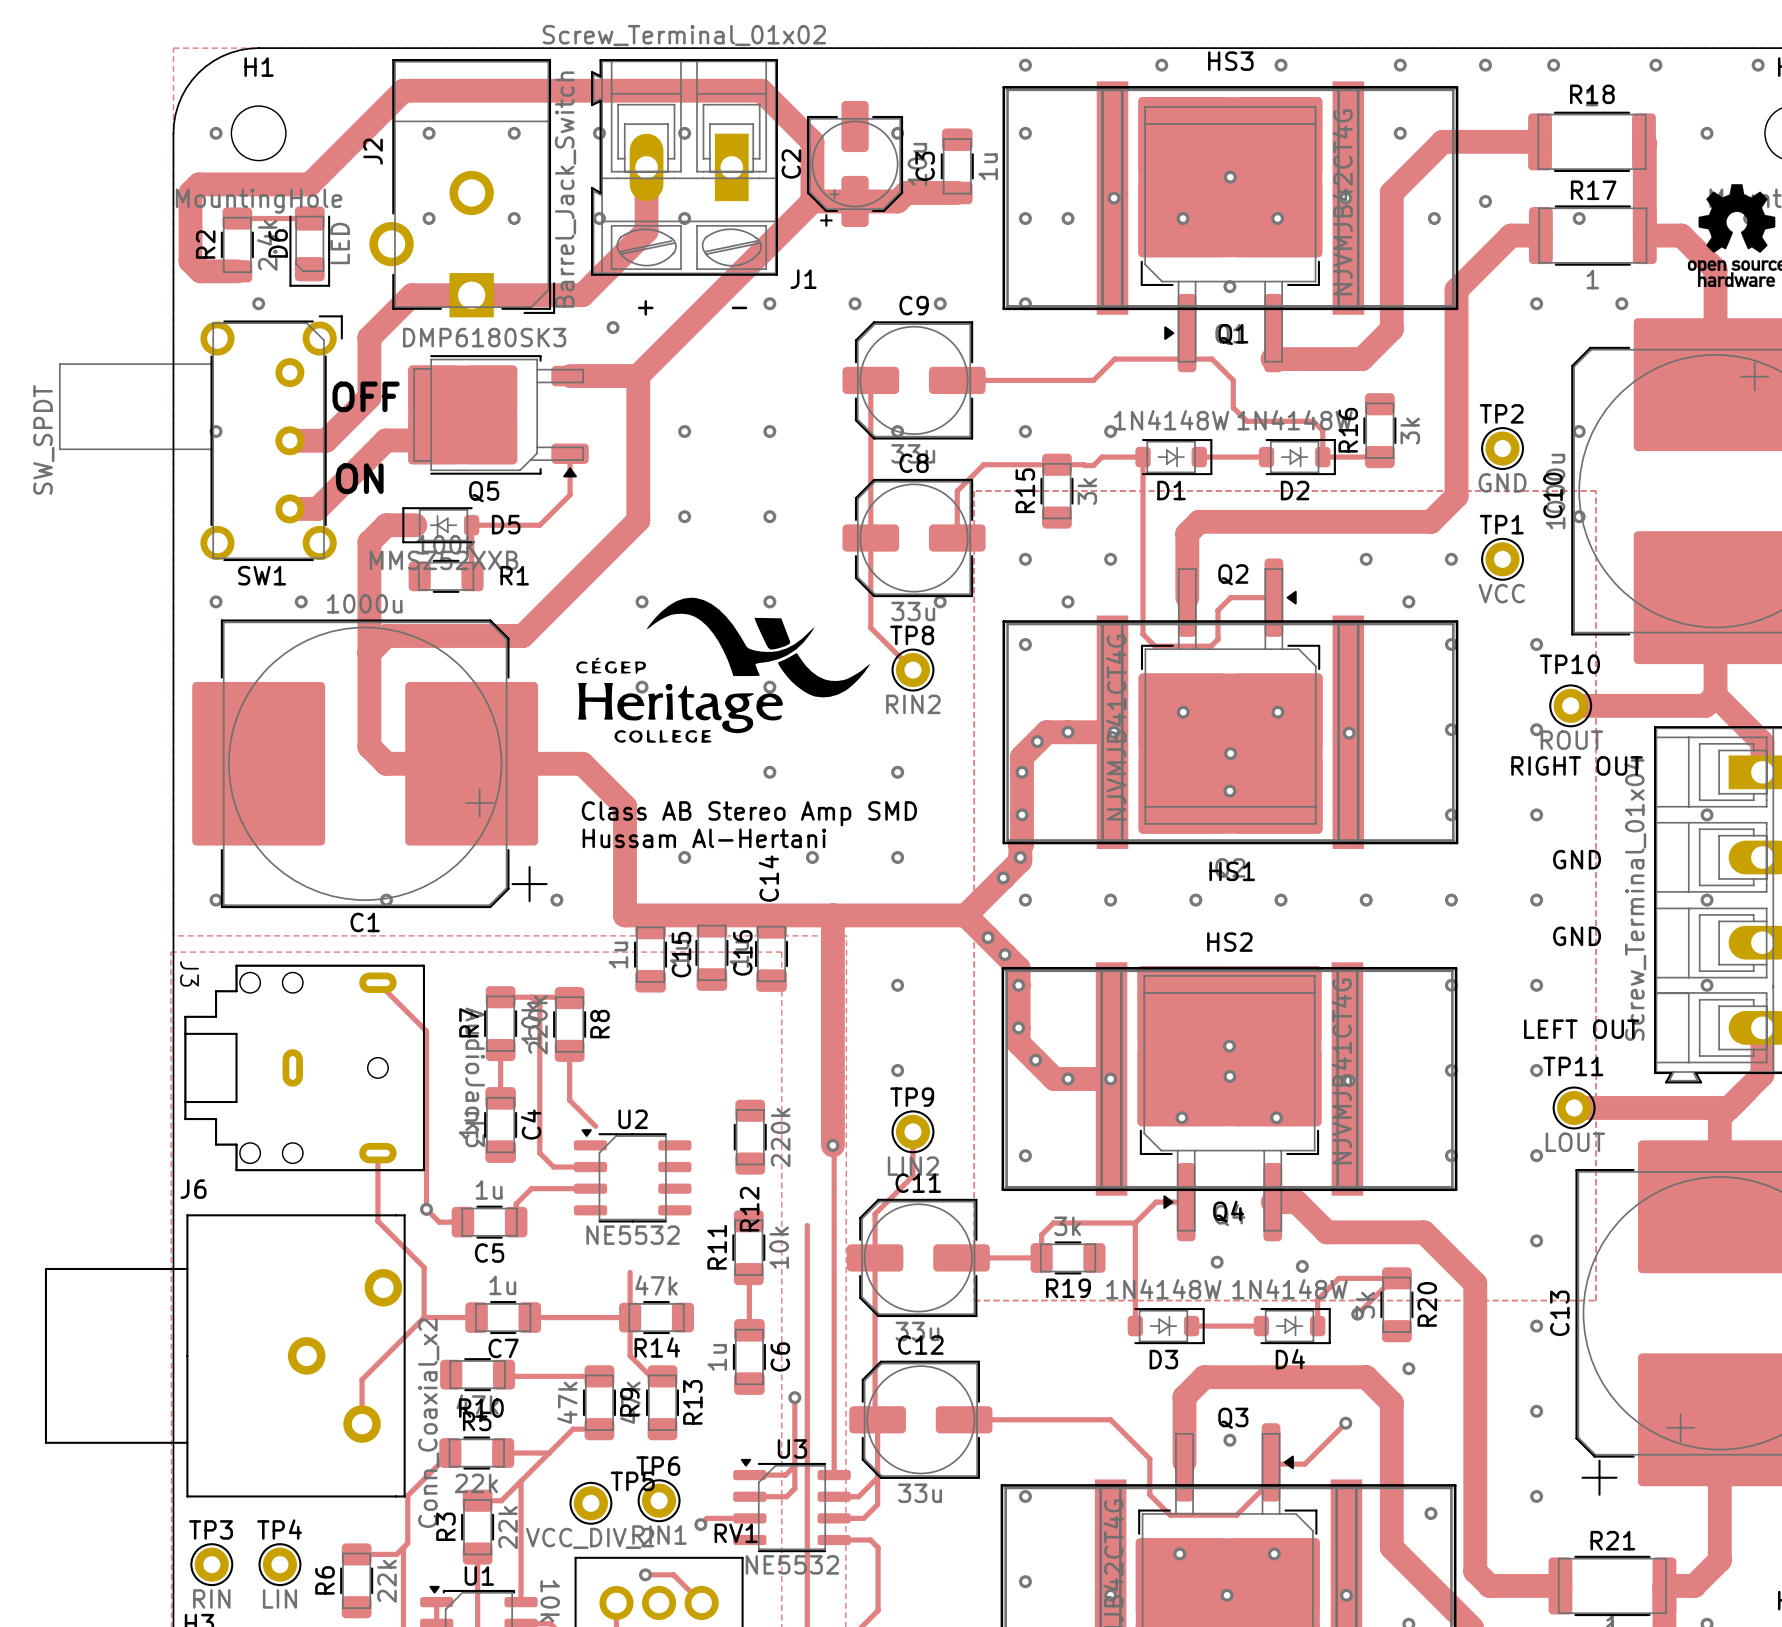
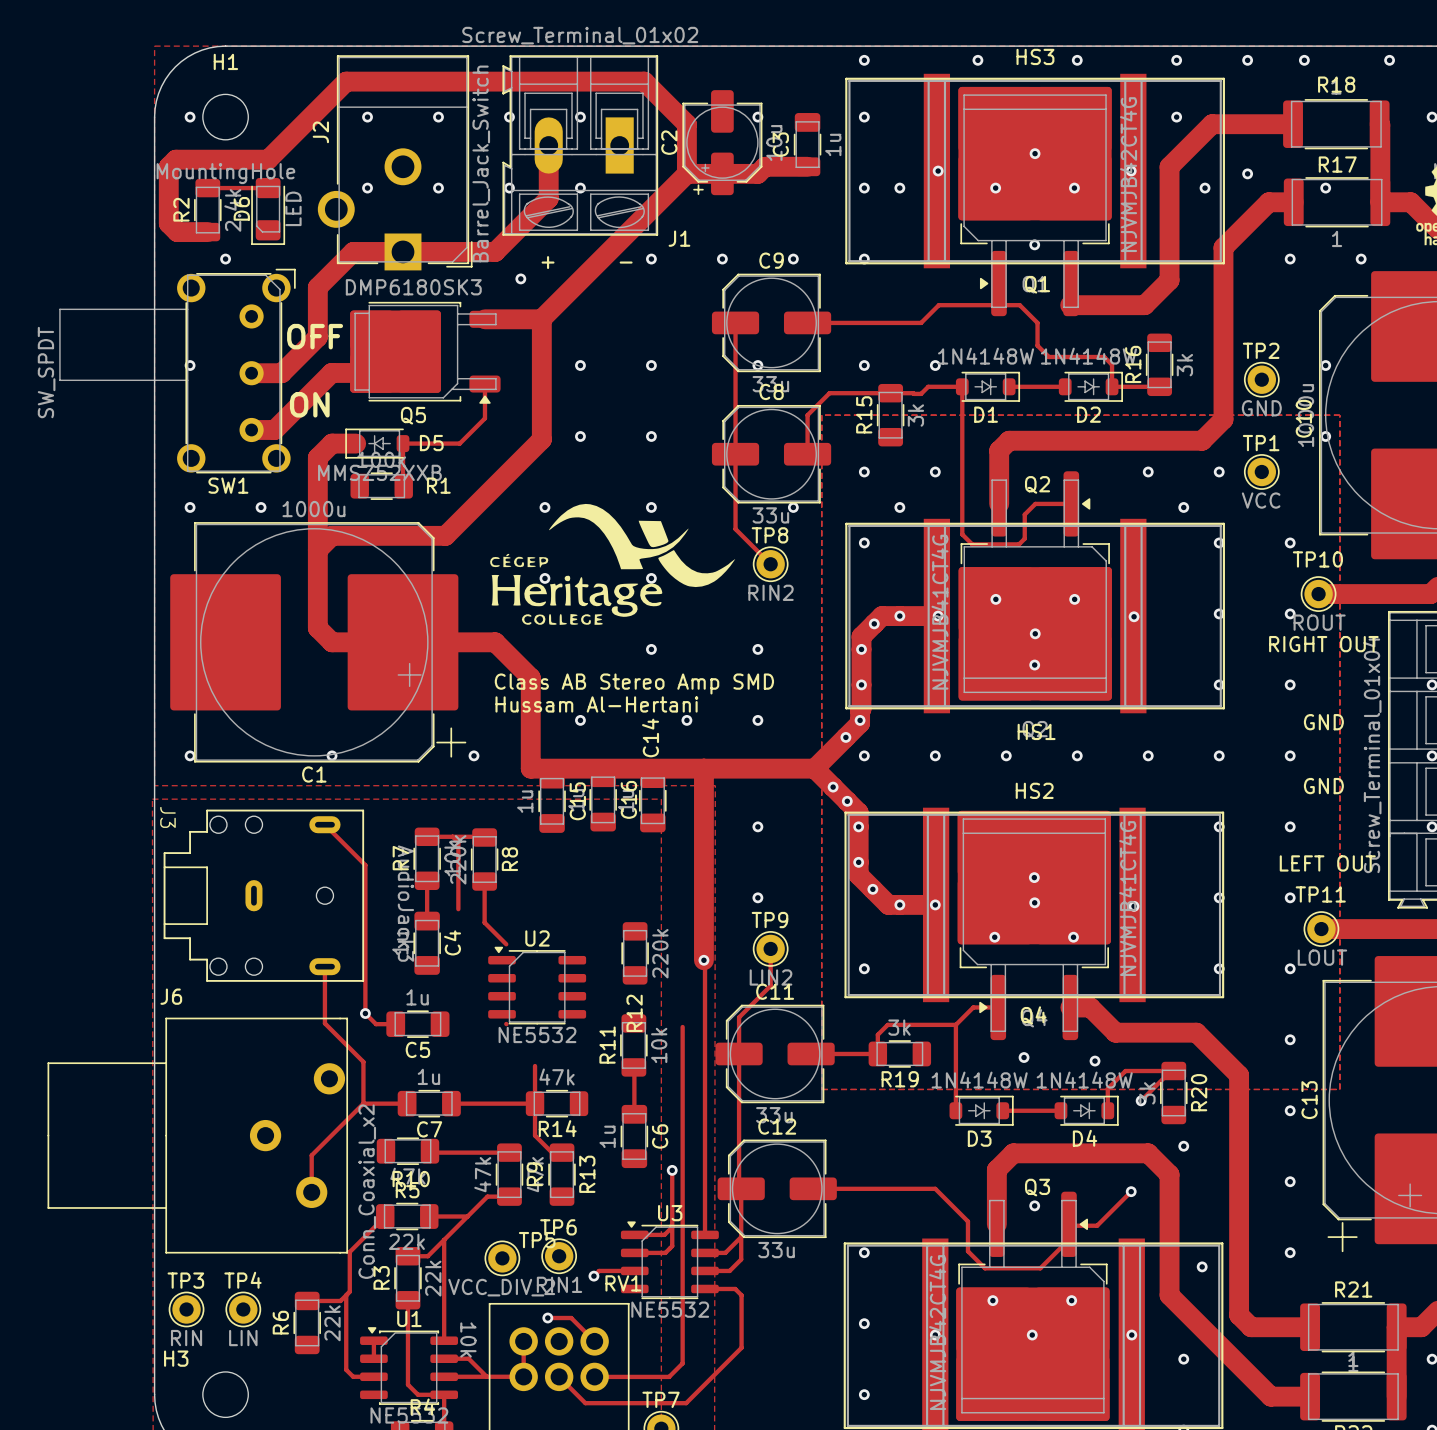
track: (538, 1004) (539, 1005) (539, 1153) (553, 1167) (590, 1167) -> (458, 842) (458, 909)
track: (590, 1188) (531, 1188) (516, 1204) (516, 1222) -> none
track: none -> (506, 1023) (506, 1024)

